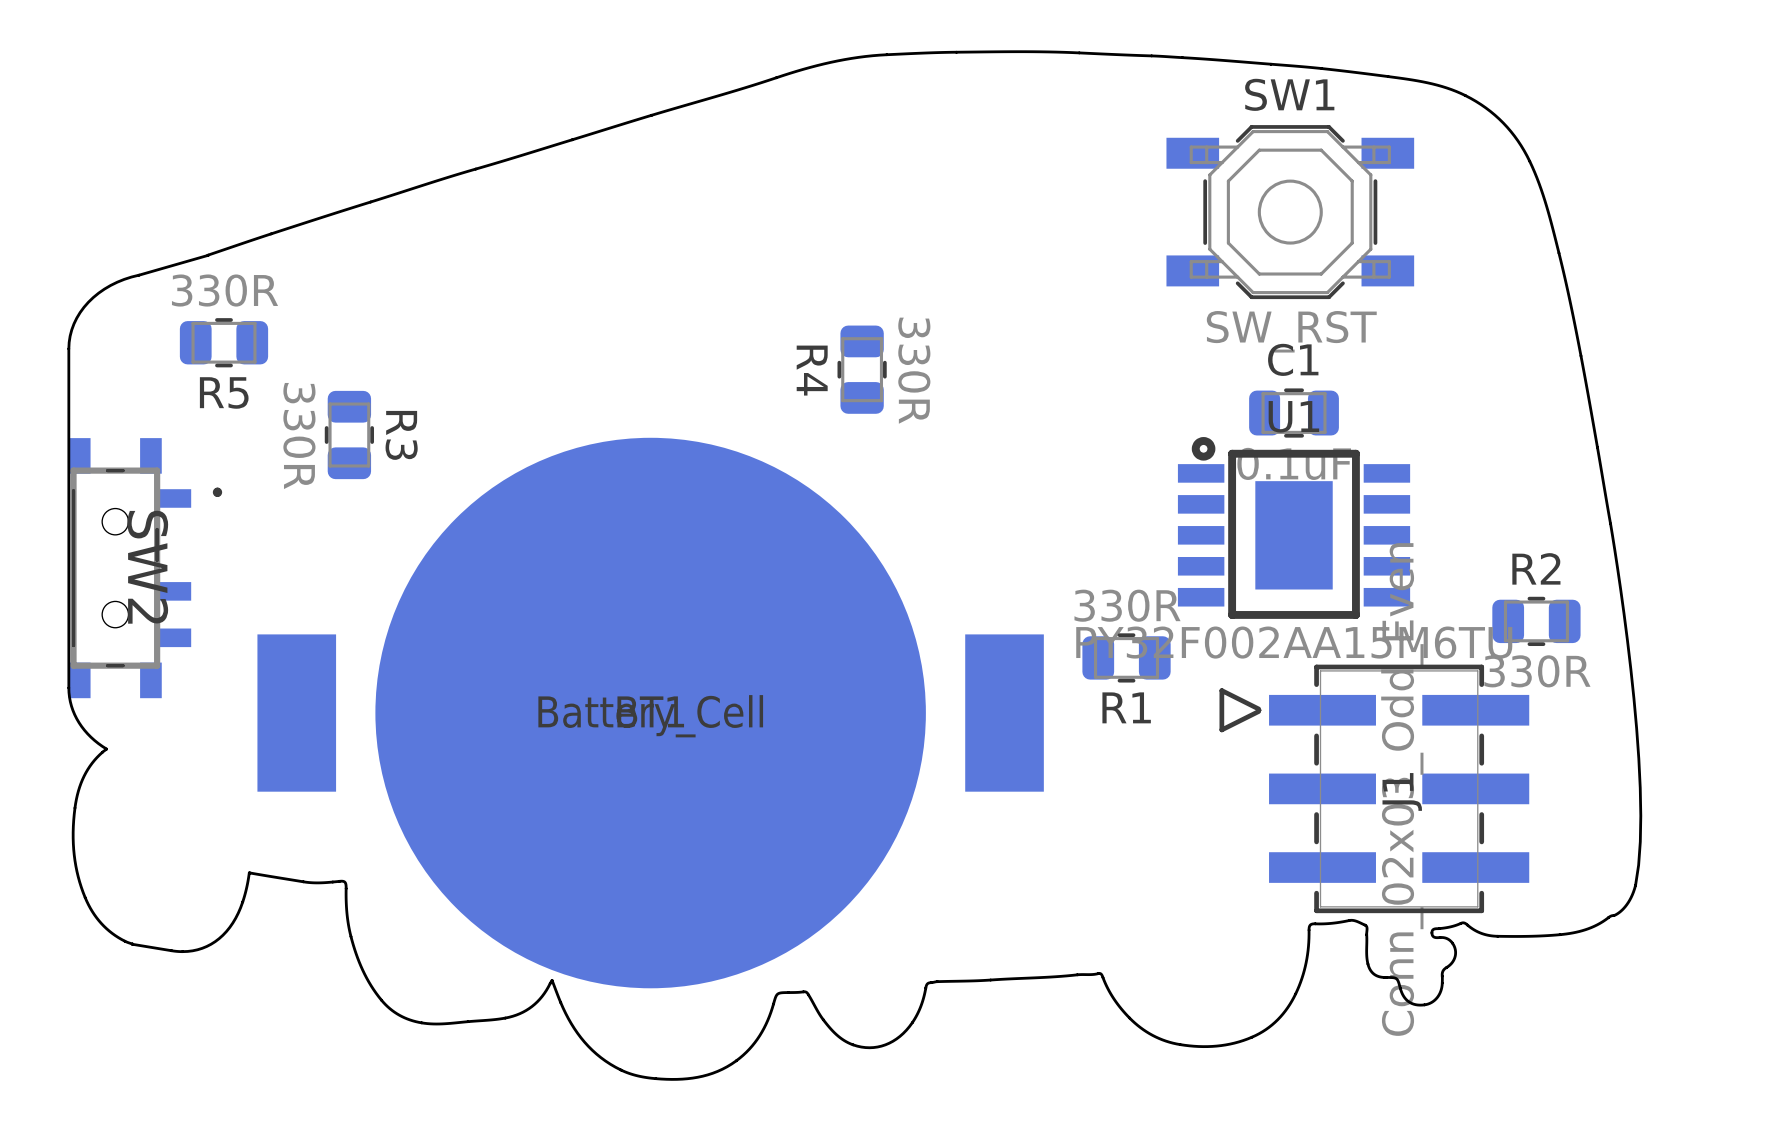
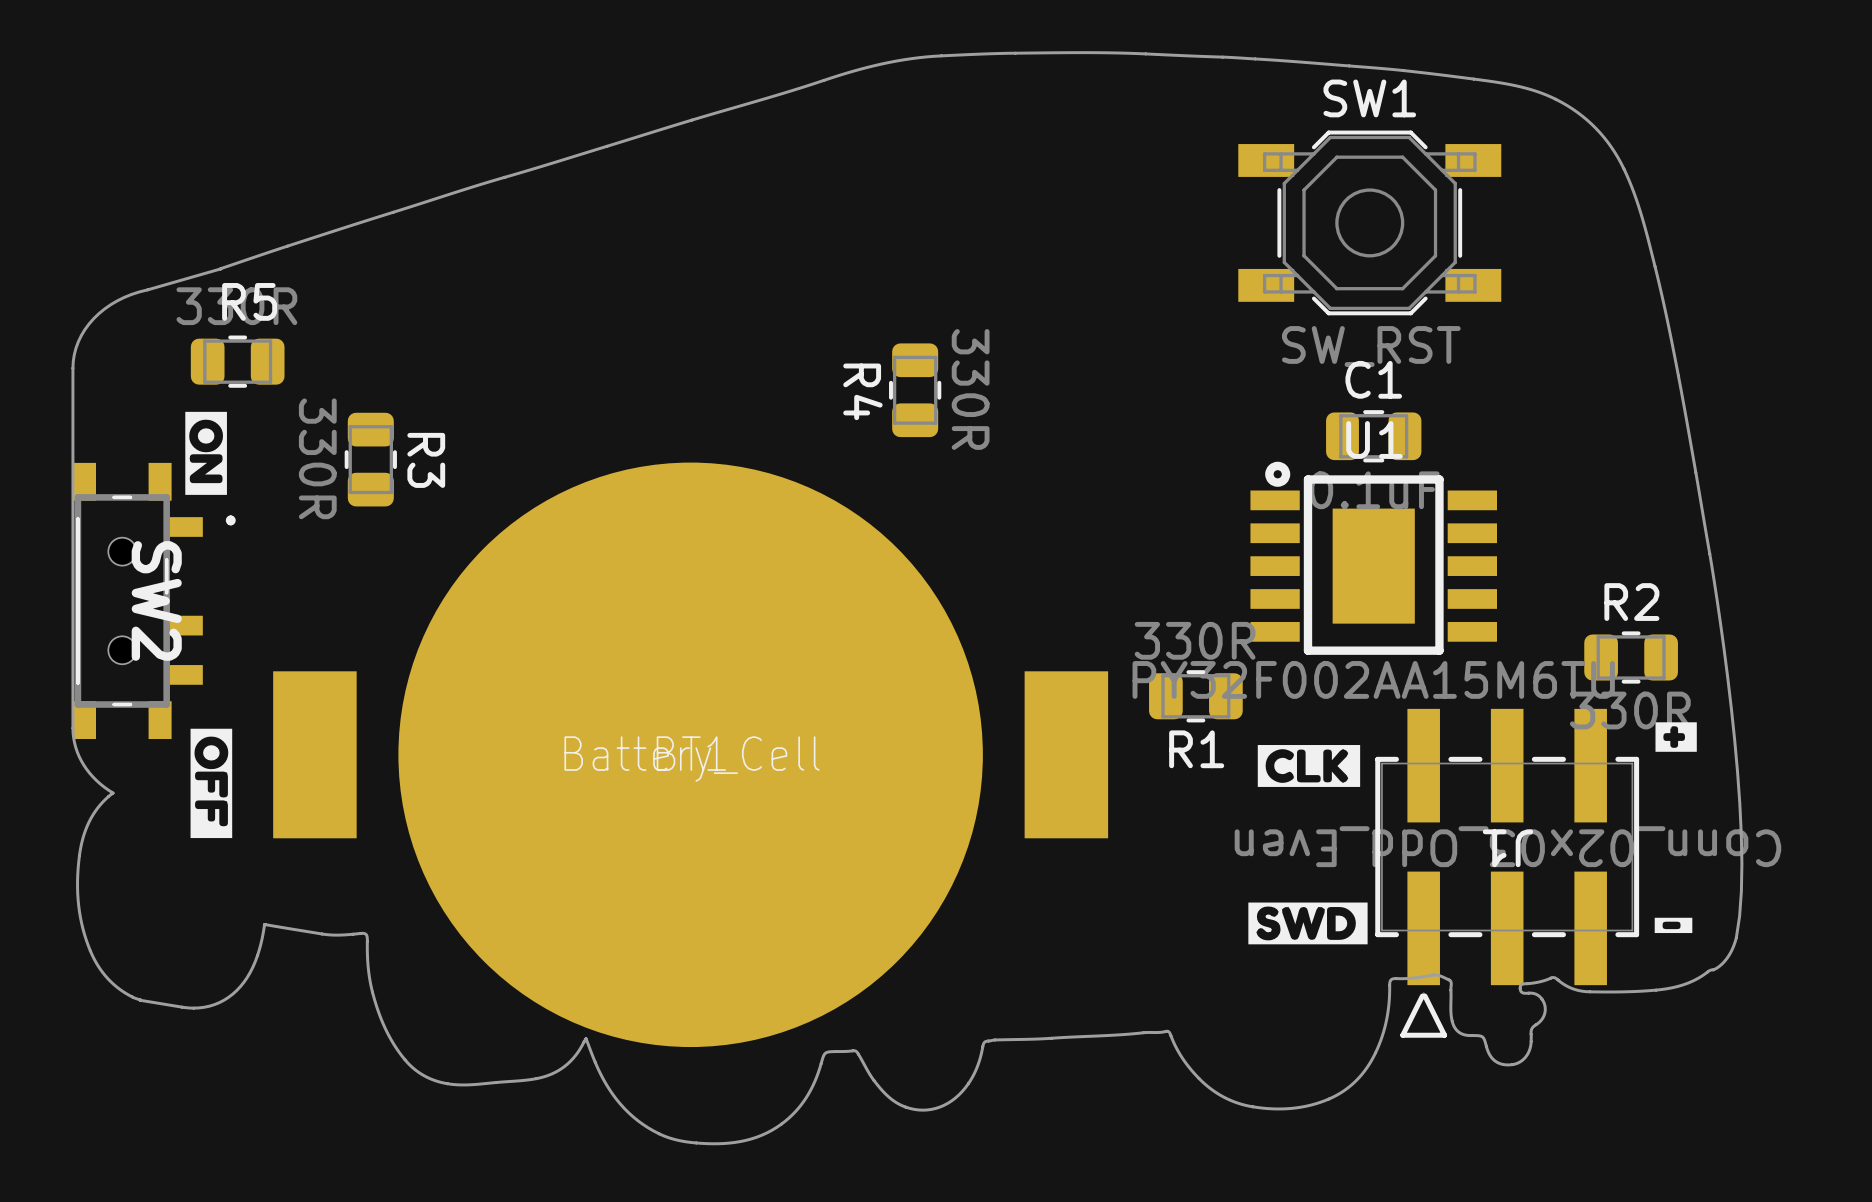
drawing: none -> [185, 411, 227, 495]
R5 name position: R5 (224, 392) -> R5 (249, 301)
drawing: none -> [1655, 722, 1697, 752]
drawing: none -> [190, 728, 233, 839]
drawing: none -> [1257, 745, 1361, 787]
J1 rotation: 0° (1374, 788) -> 90° counterclockwise (1507, 873)
drawing: none -> [1248, 902, 1368, 945]
drawing: none -> [1654, 917, 1693, 934]

